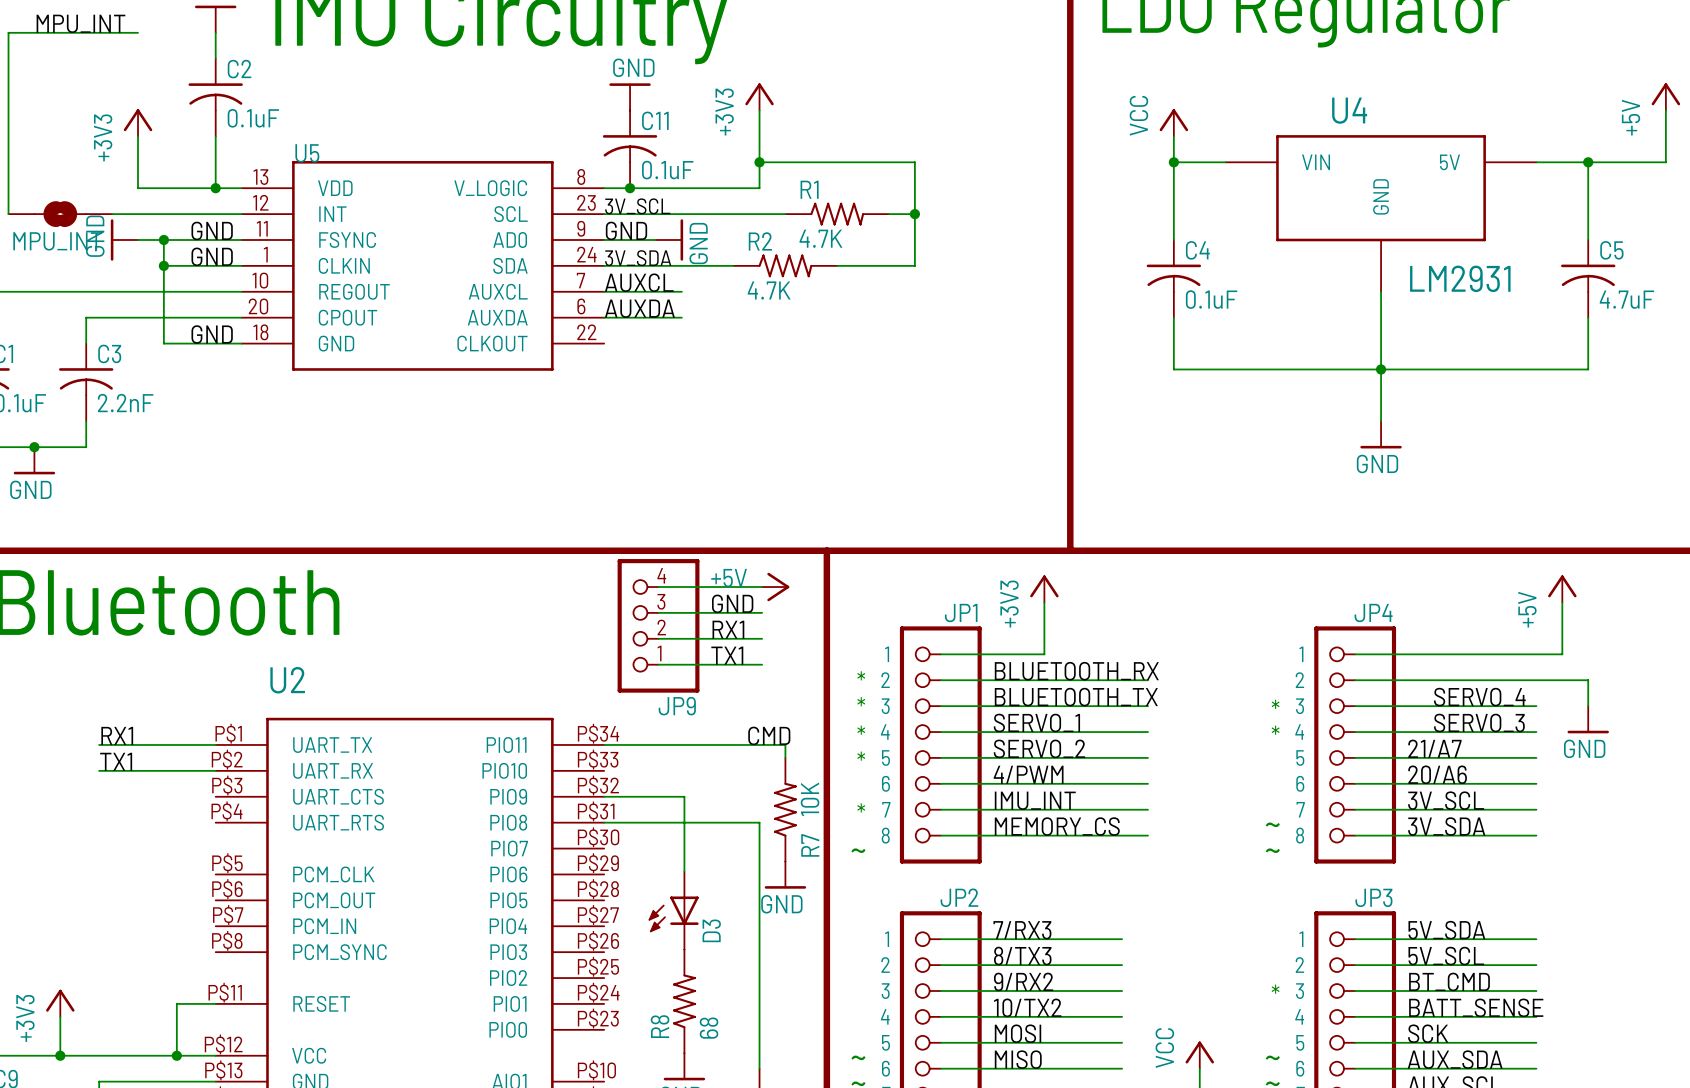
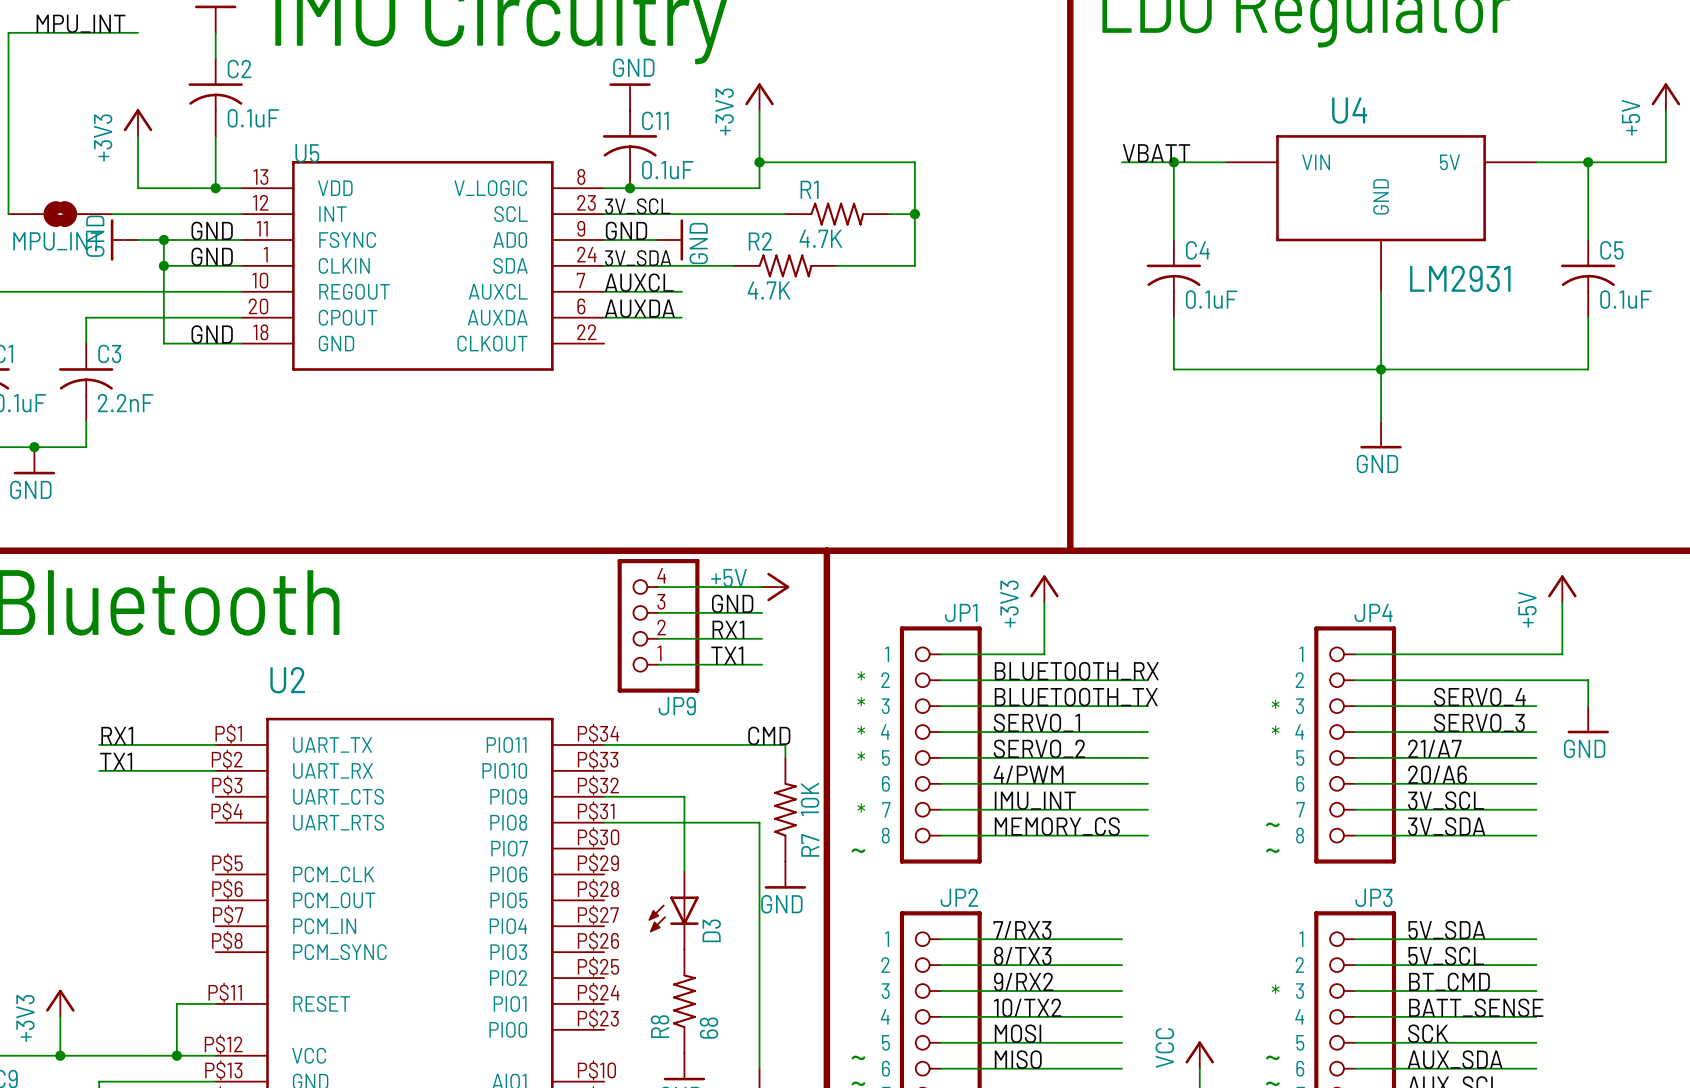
power symbol: VCC (1173, 122) -> none
wire: (1173, 136) (1173, 162) -> (1122, 162) (1173, 162)
label: none -> VBATT (1156, 153)
C5 value: 4.7uF (1626, 299) -> 0.1uF (1625, 299)

